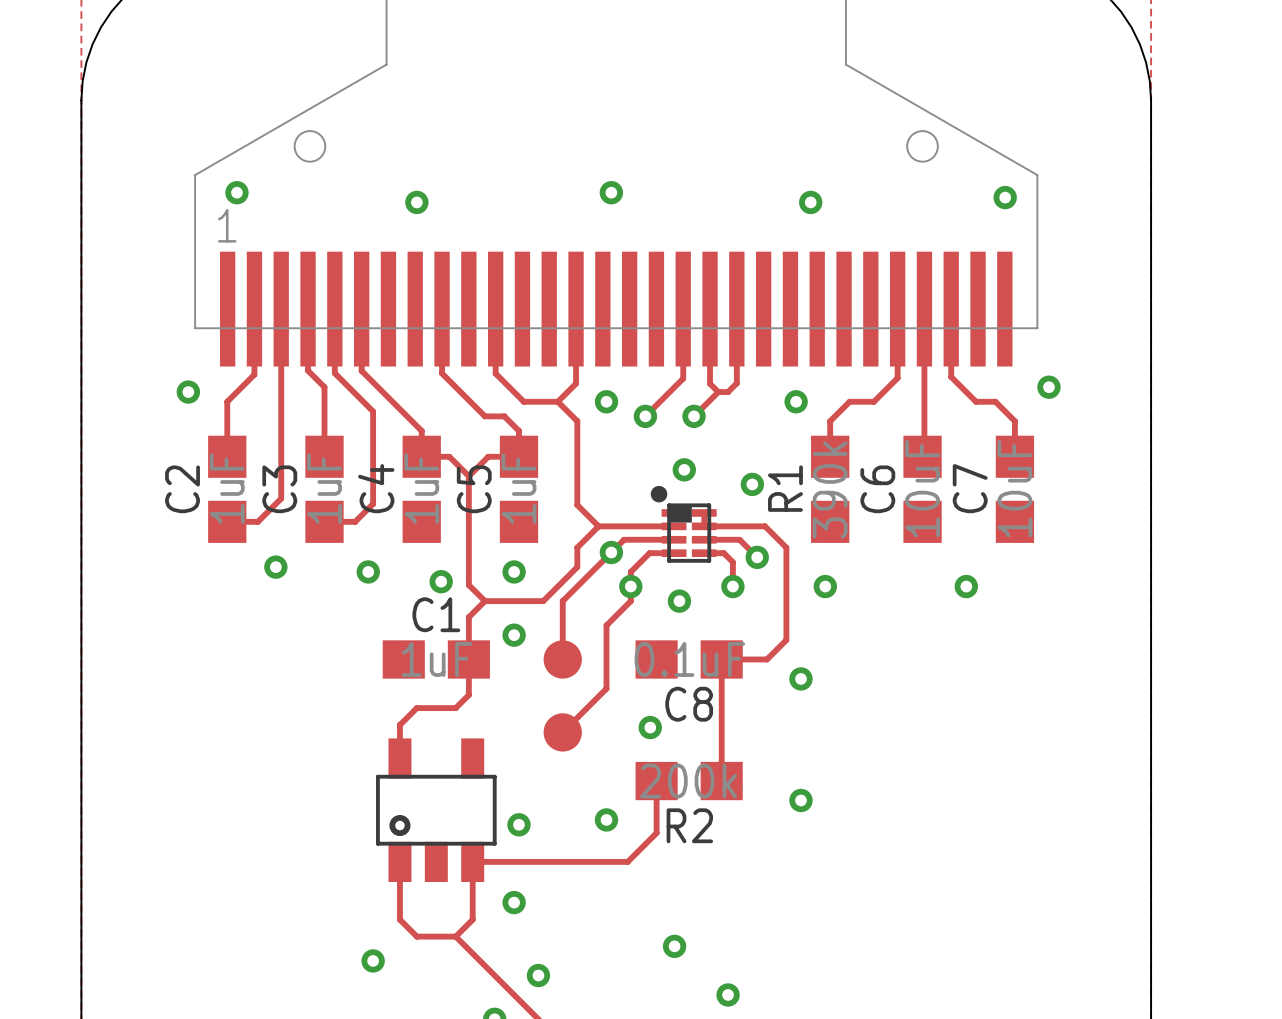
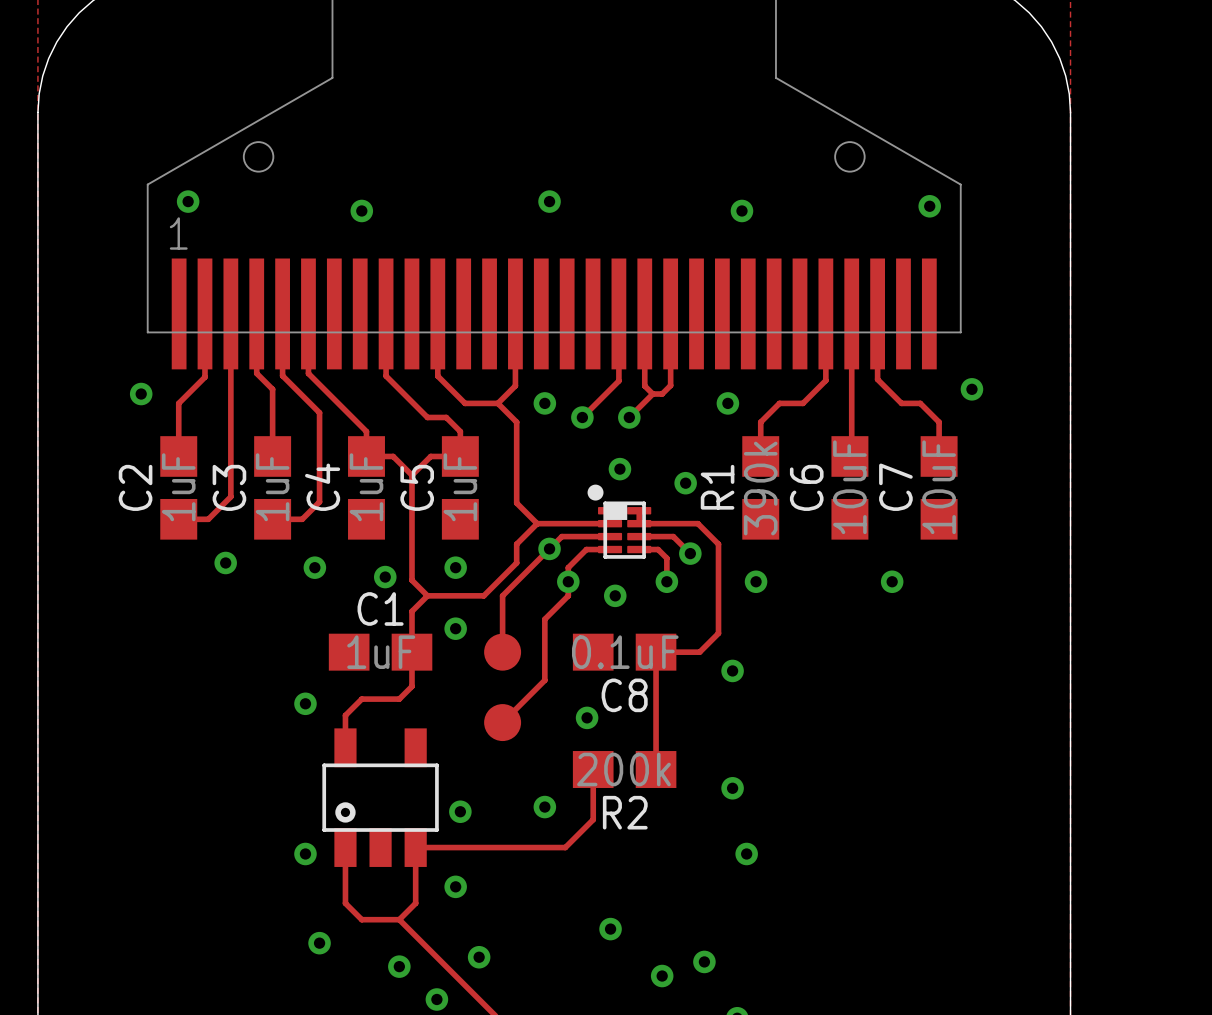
via: none -> (305, 703)
via: none -> (305, 853)
via: none -> (746, 853)
via: none -> (704, 961)
via: none -> (399, 966)

